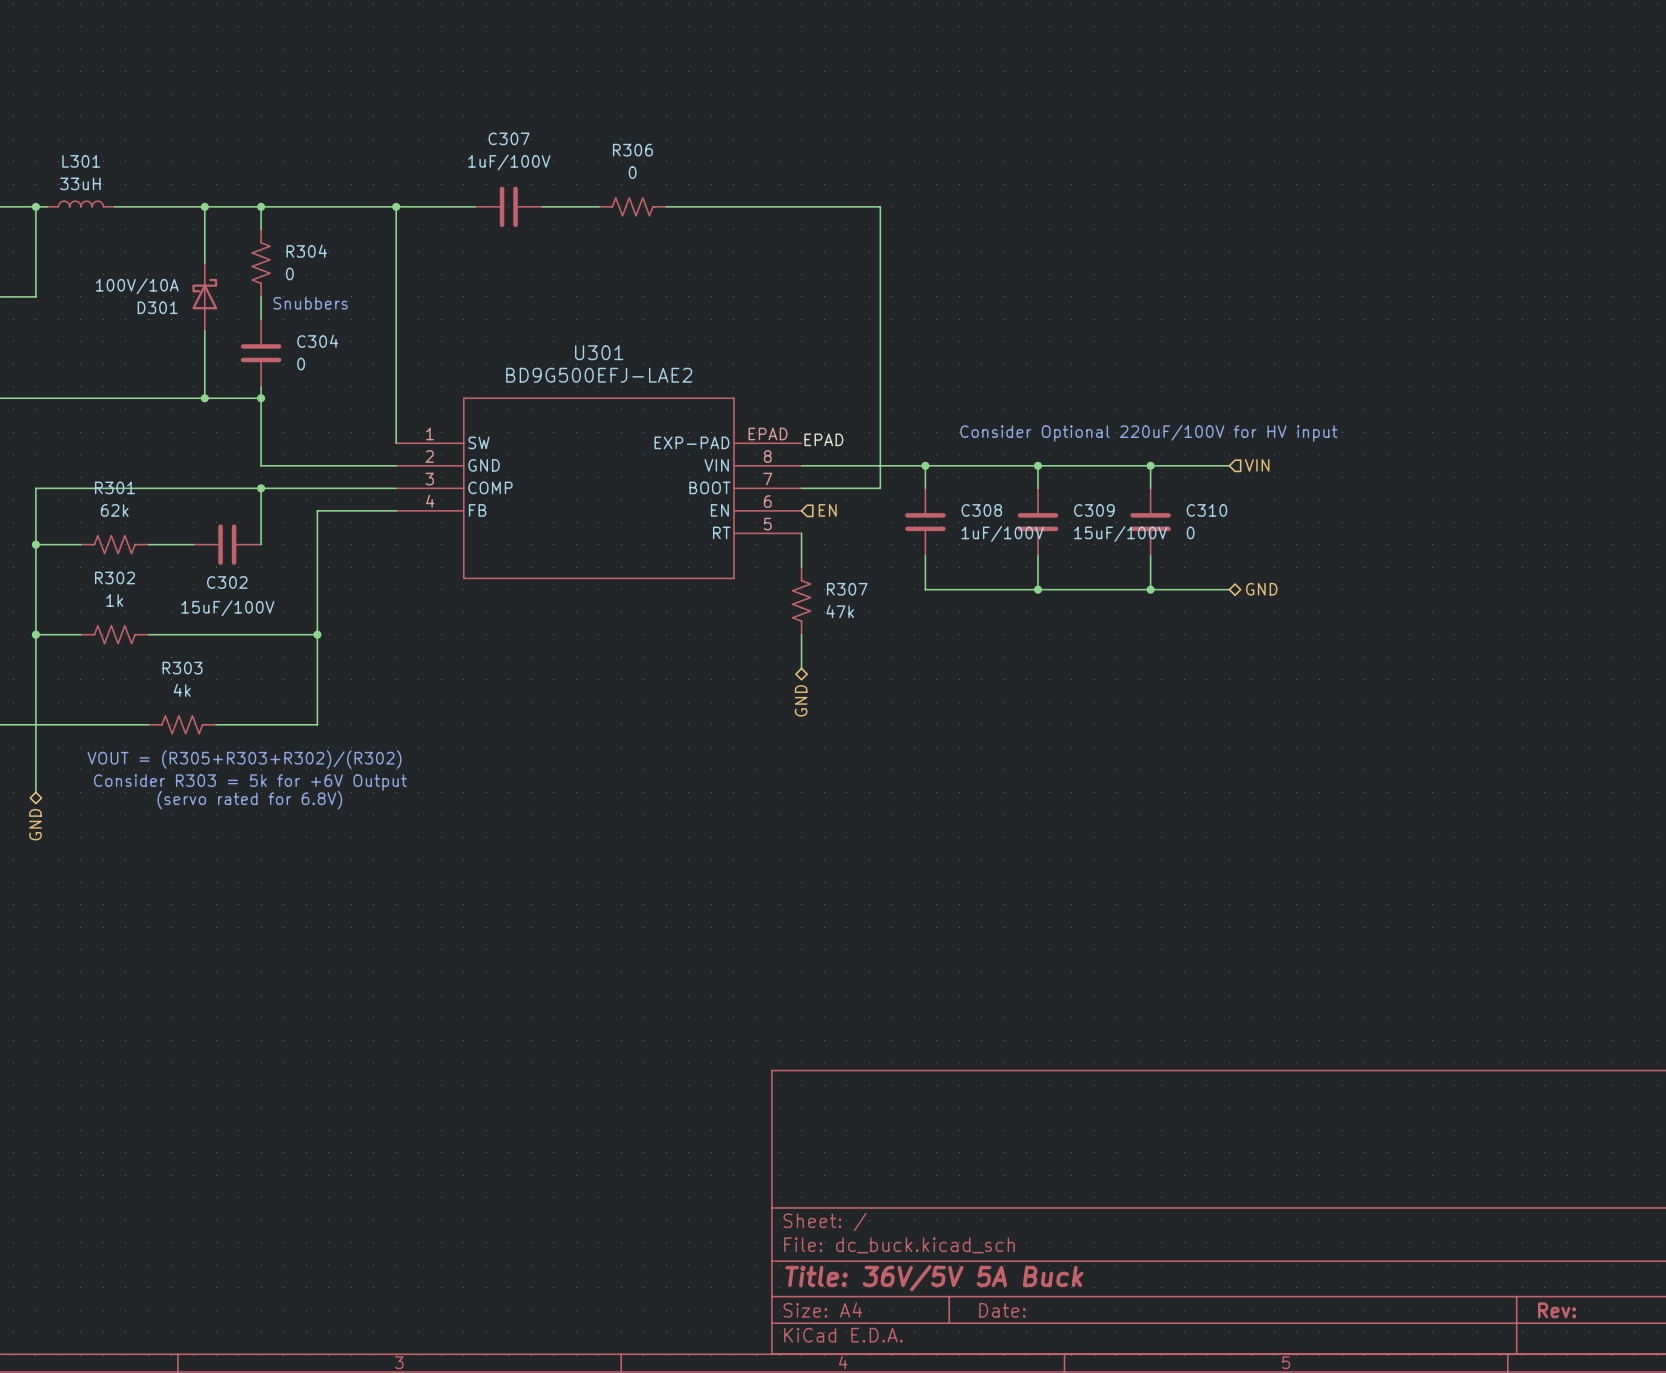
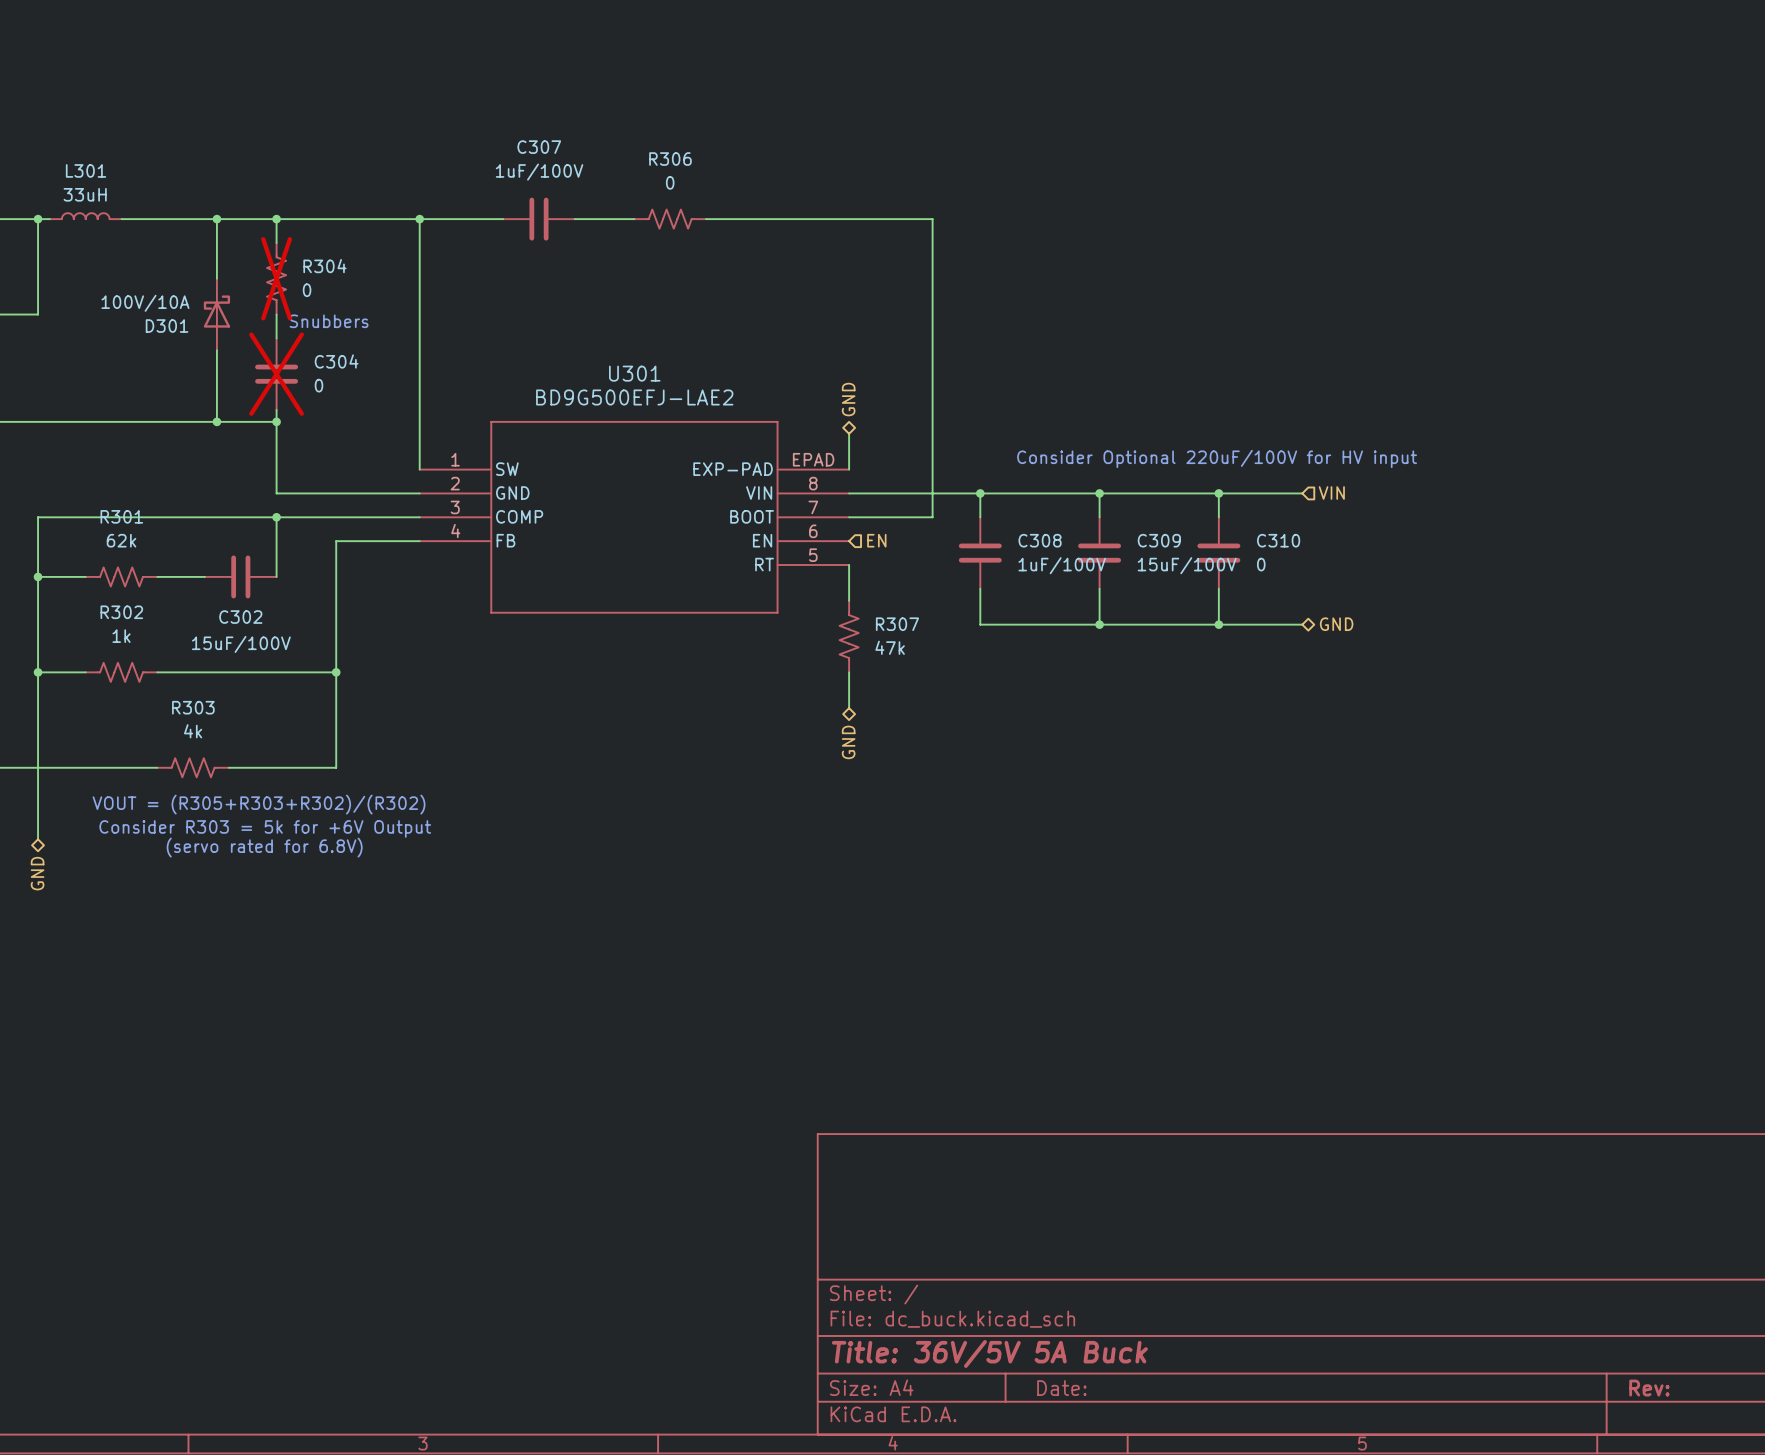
R304 do-not-place cross: none -> (276, 278)
C304 do-not-place cross: none -> (276, 374)
hierarchical label: none -> GND (848, 399)
wire: none -> (849, 433) (849, 469)
label: EPAD (823, 439) -> none

